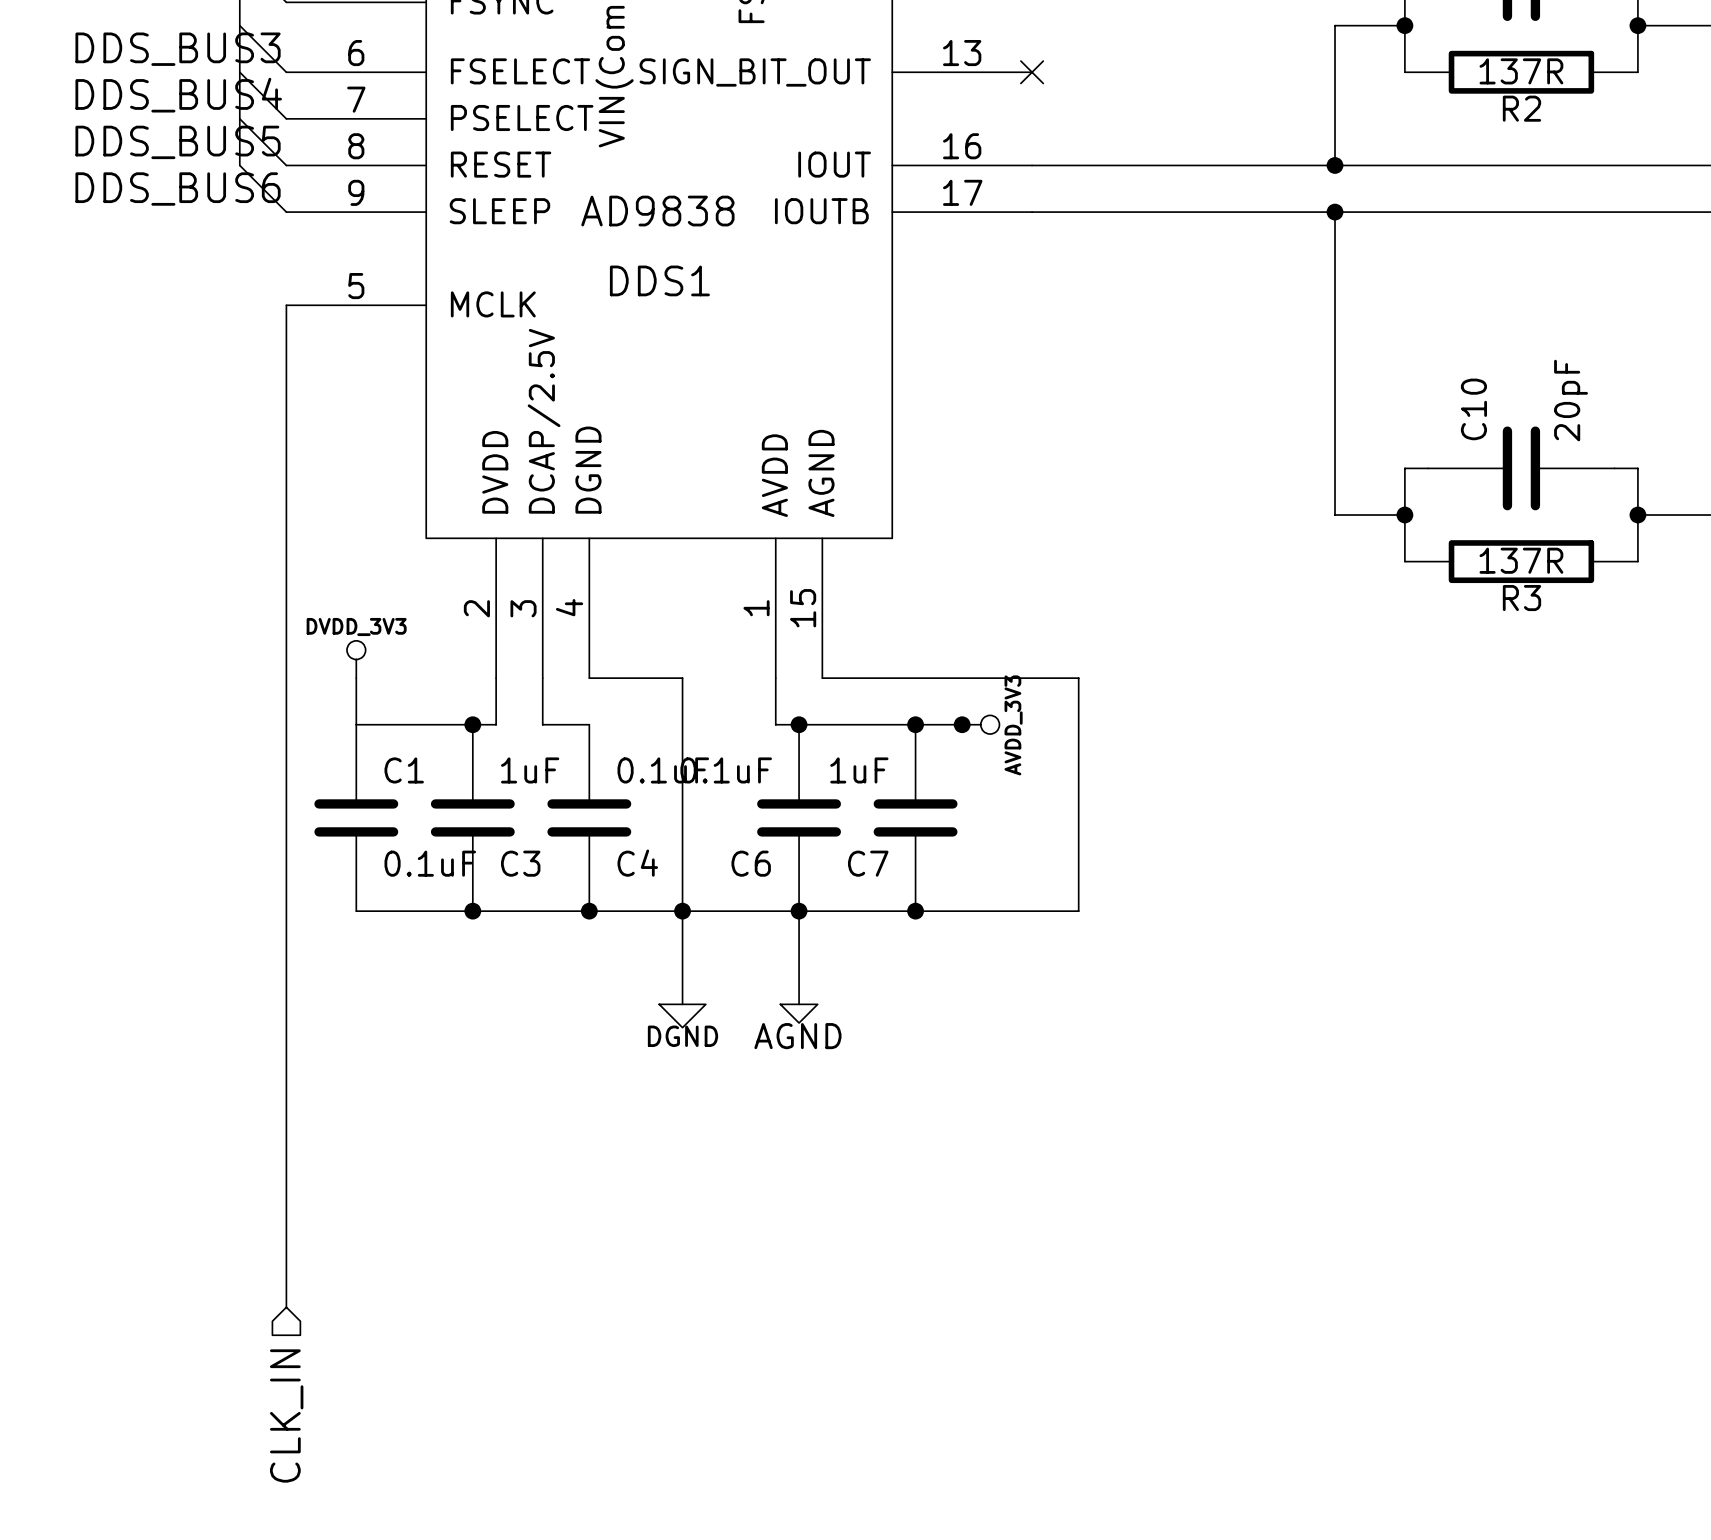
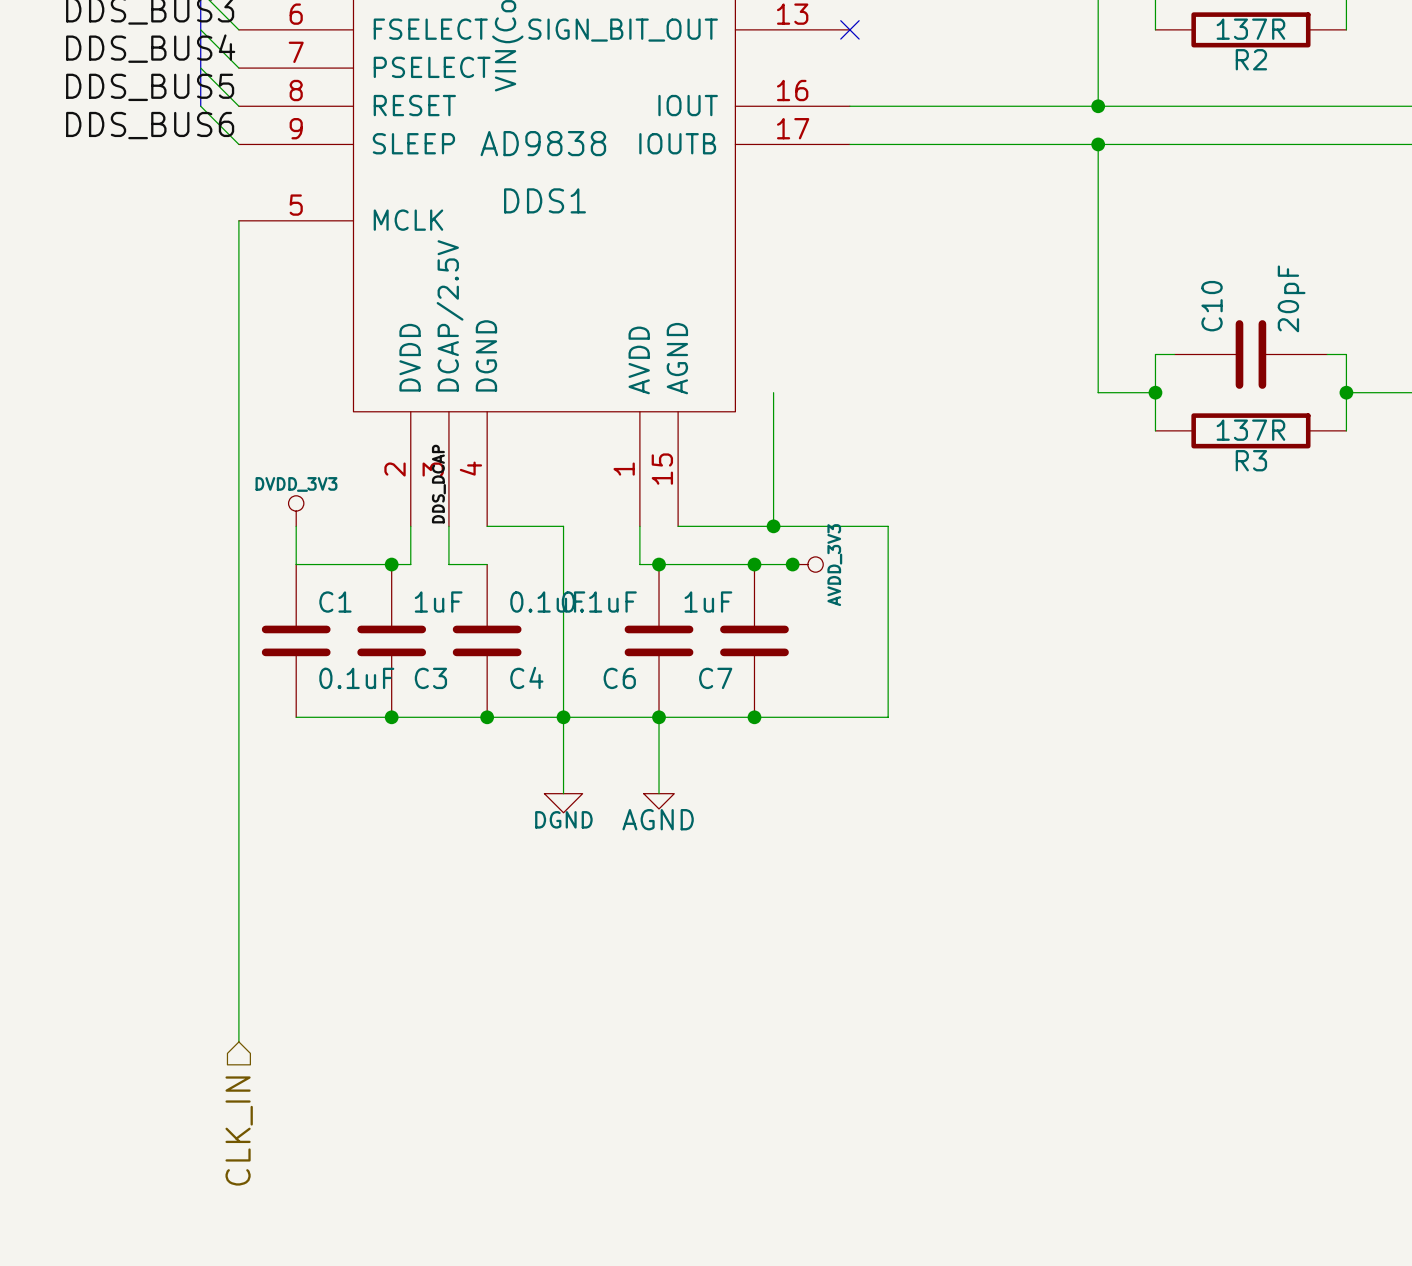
wire: none -> (773, 392) (773, 526)
label: none -> DDS_DCAP (438, 484)
junction: none -> (773, 526)

